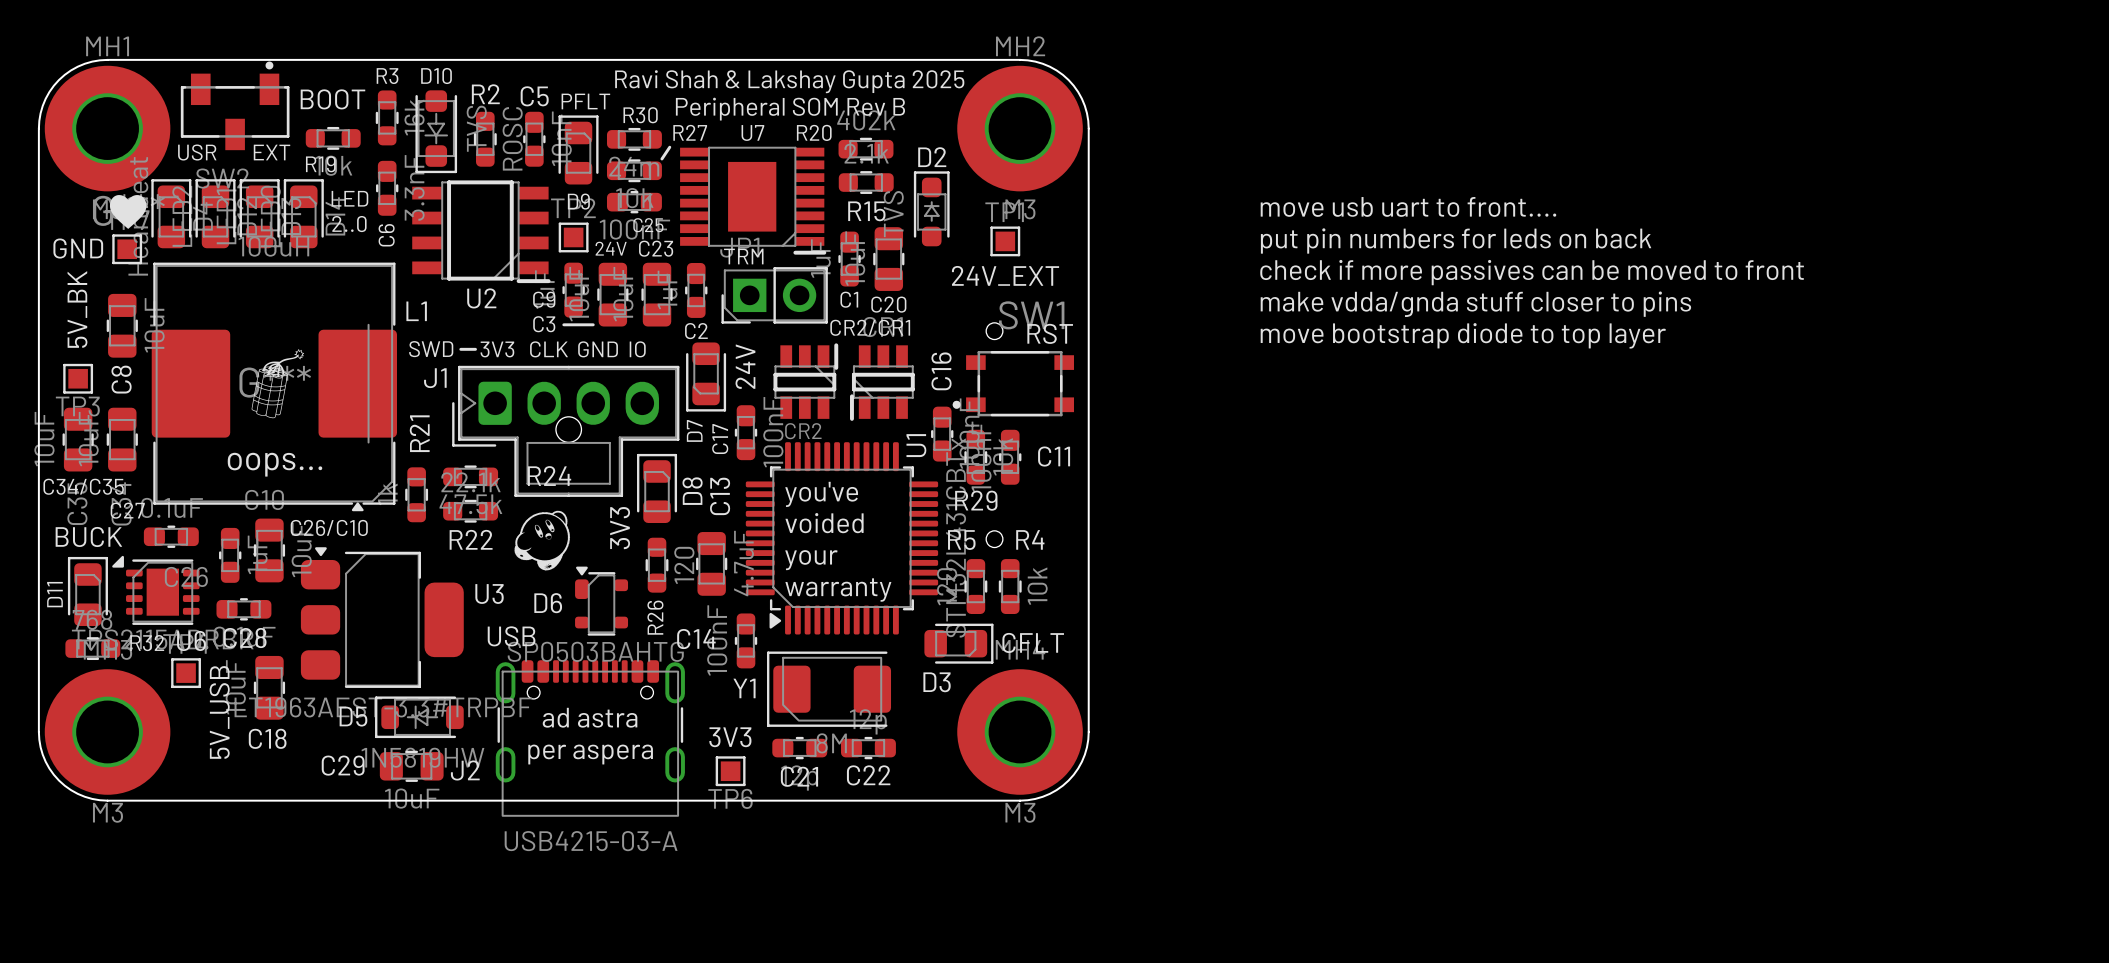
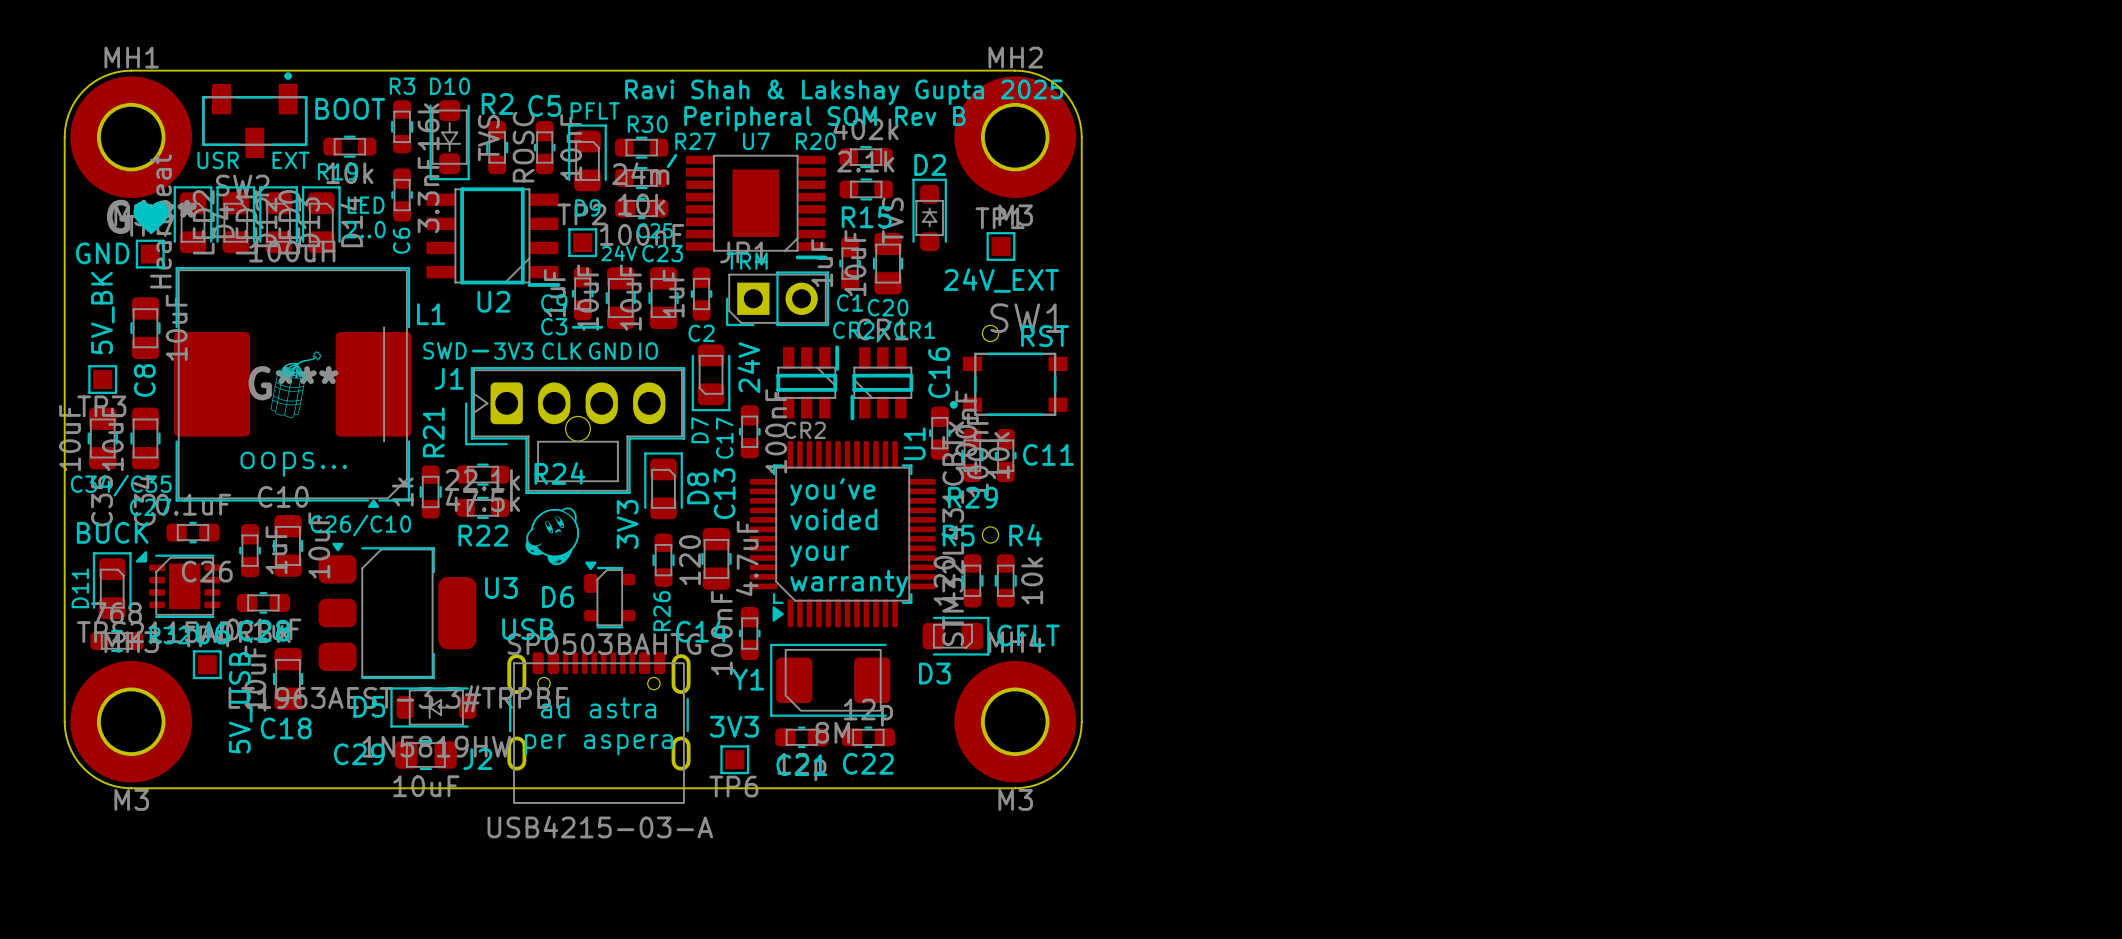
text: move usb uart to front.... (1408, 206) -> none
text: put pin numbers for leds on back (1456, 240) -> none
text: check if more passives can be moved to front (1532, 272) -> none
text: make vdda/gnda stuff closer to pins (1475, 304) -> none
text: move bootstrap diode to top layer (1463, 335) -> none

